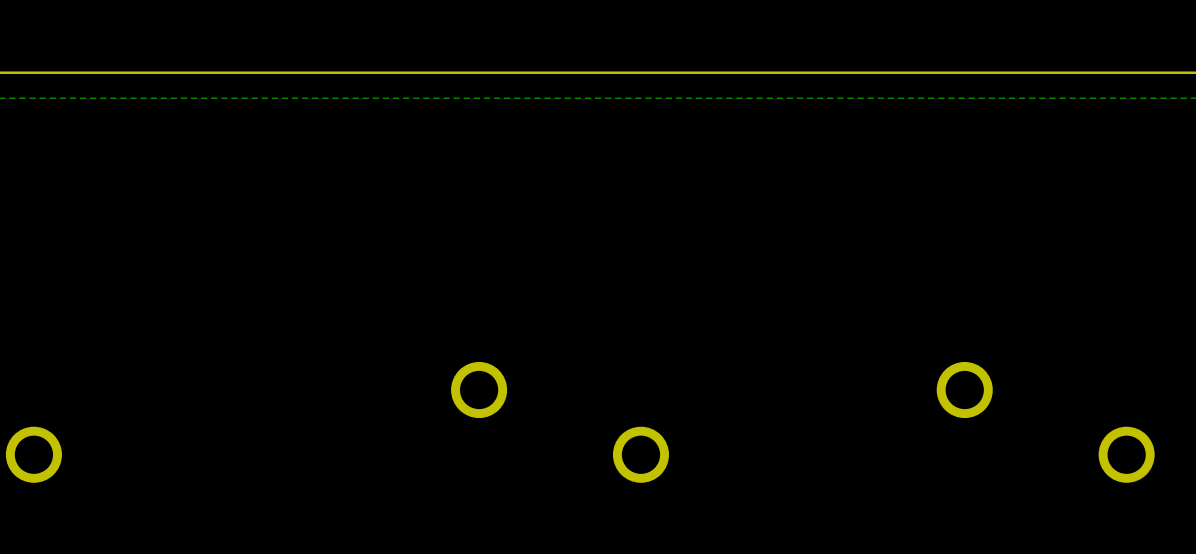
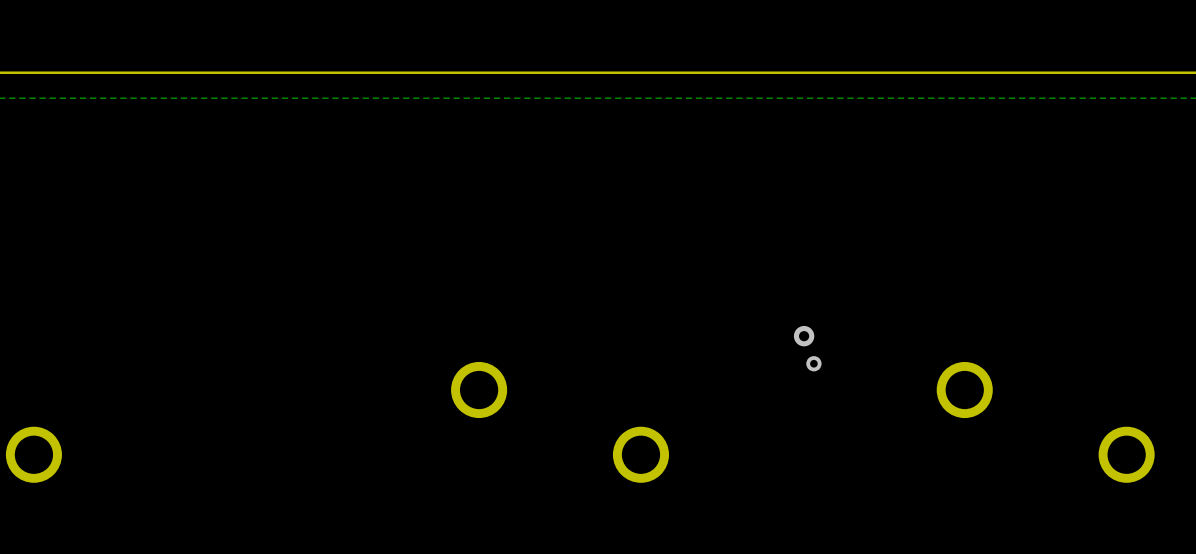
via: none -> (804, 336)
via: none -> (813, 363)

